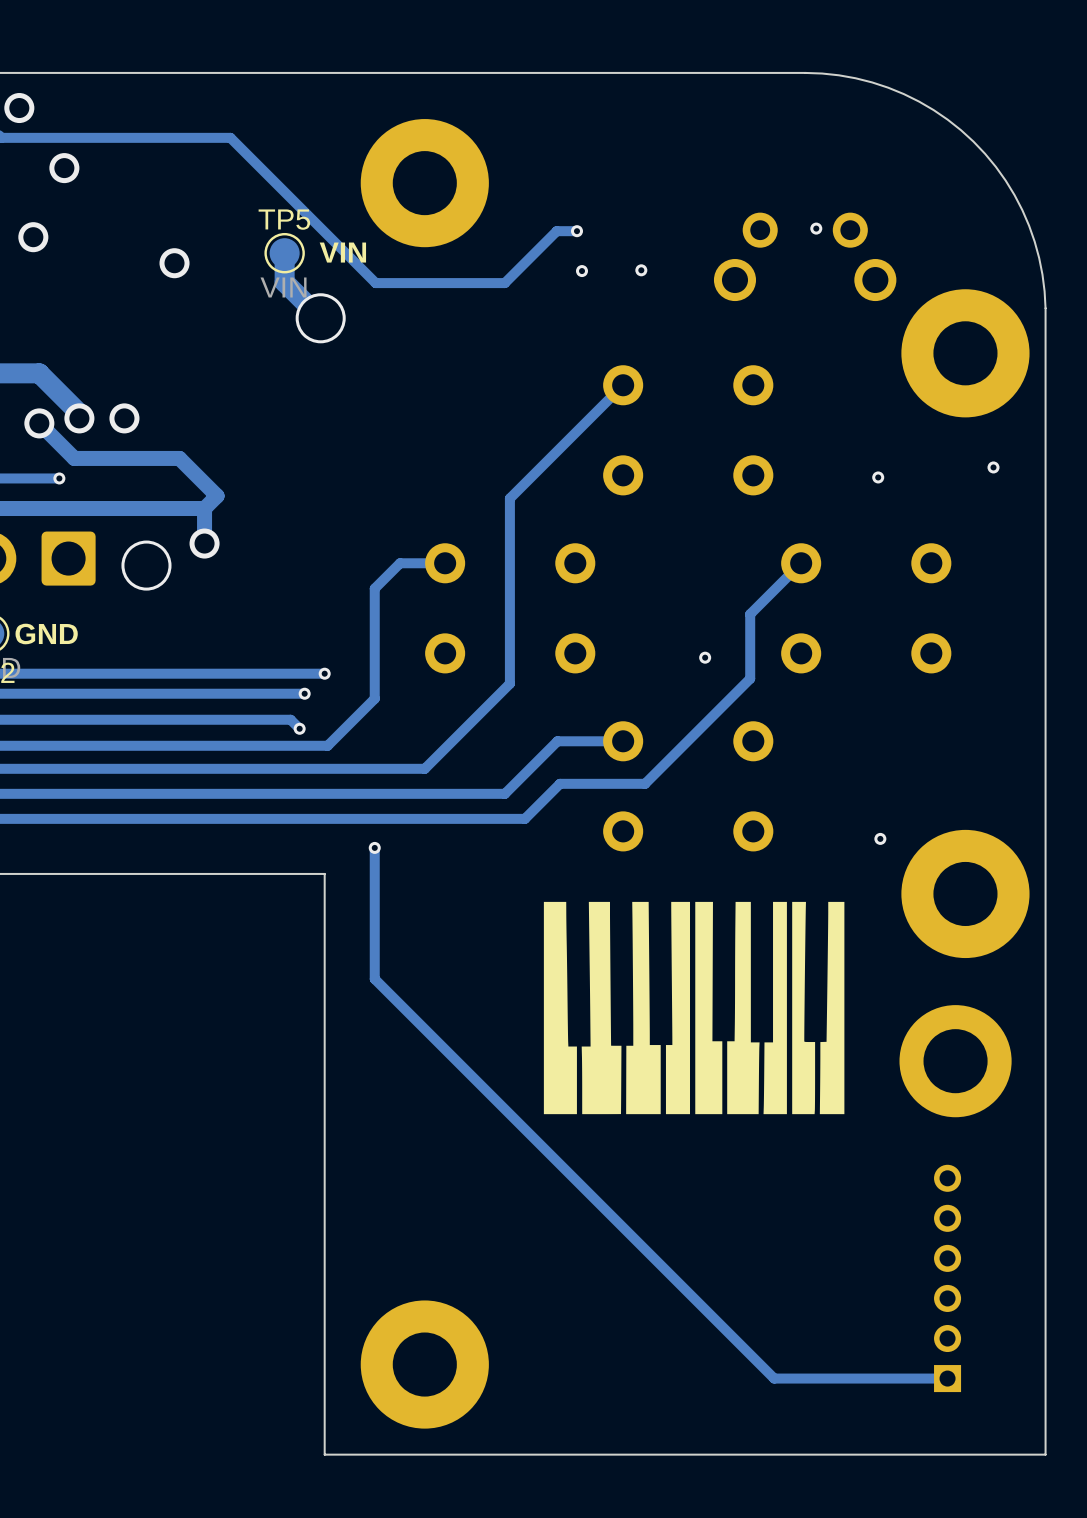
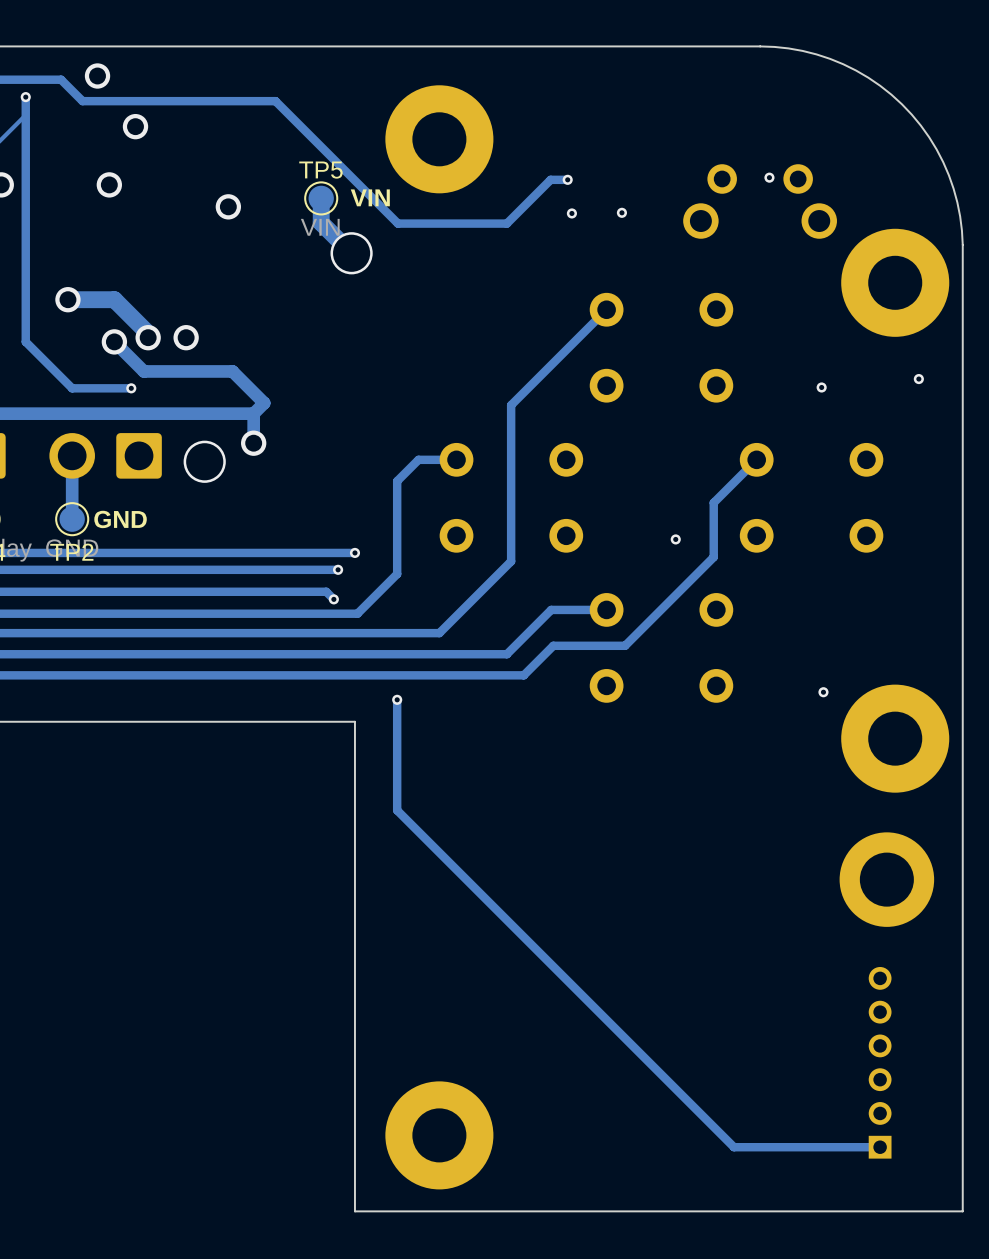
drawing: [543, 901, 845, 1115] -> none

